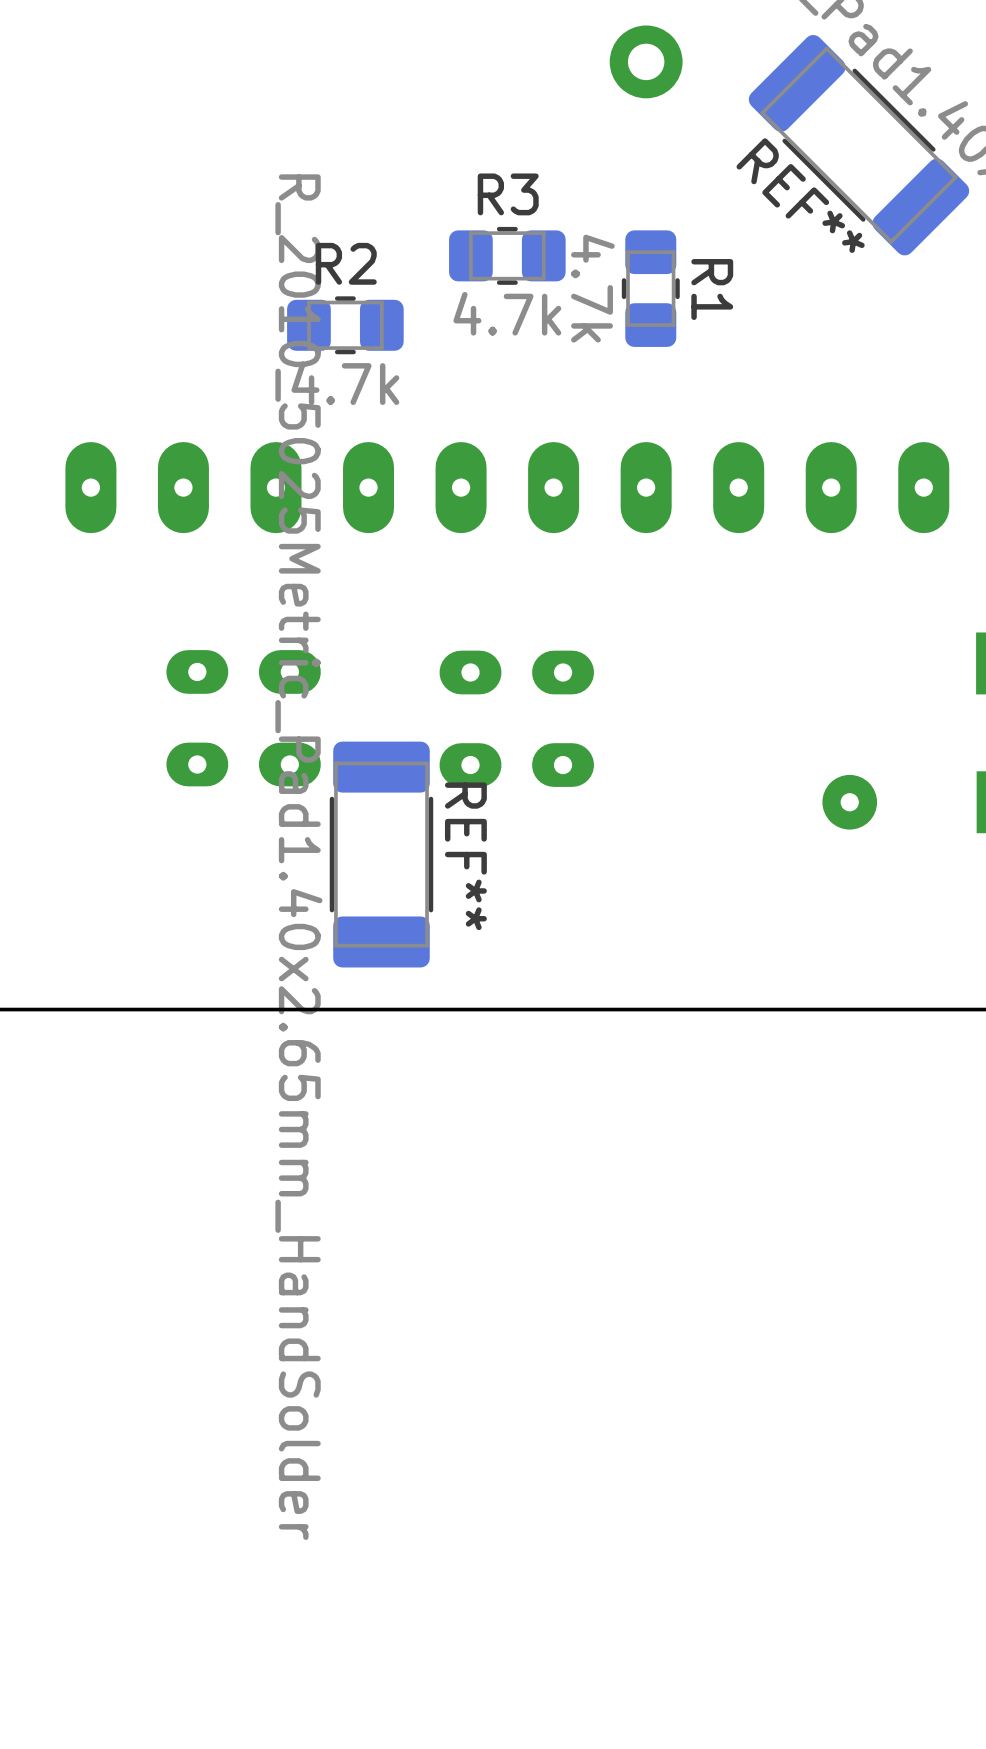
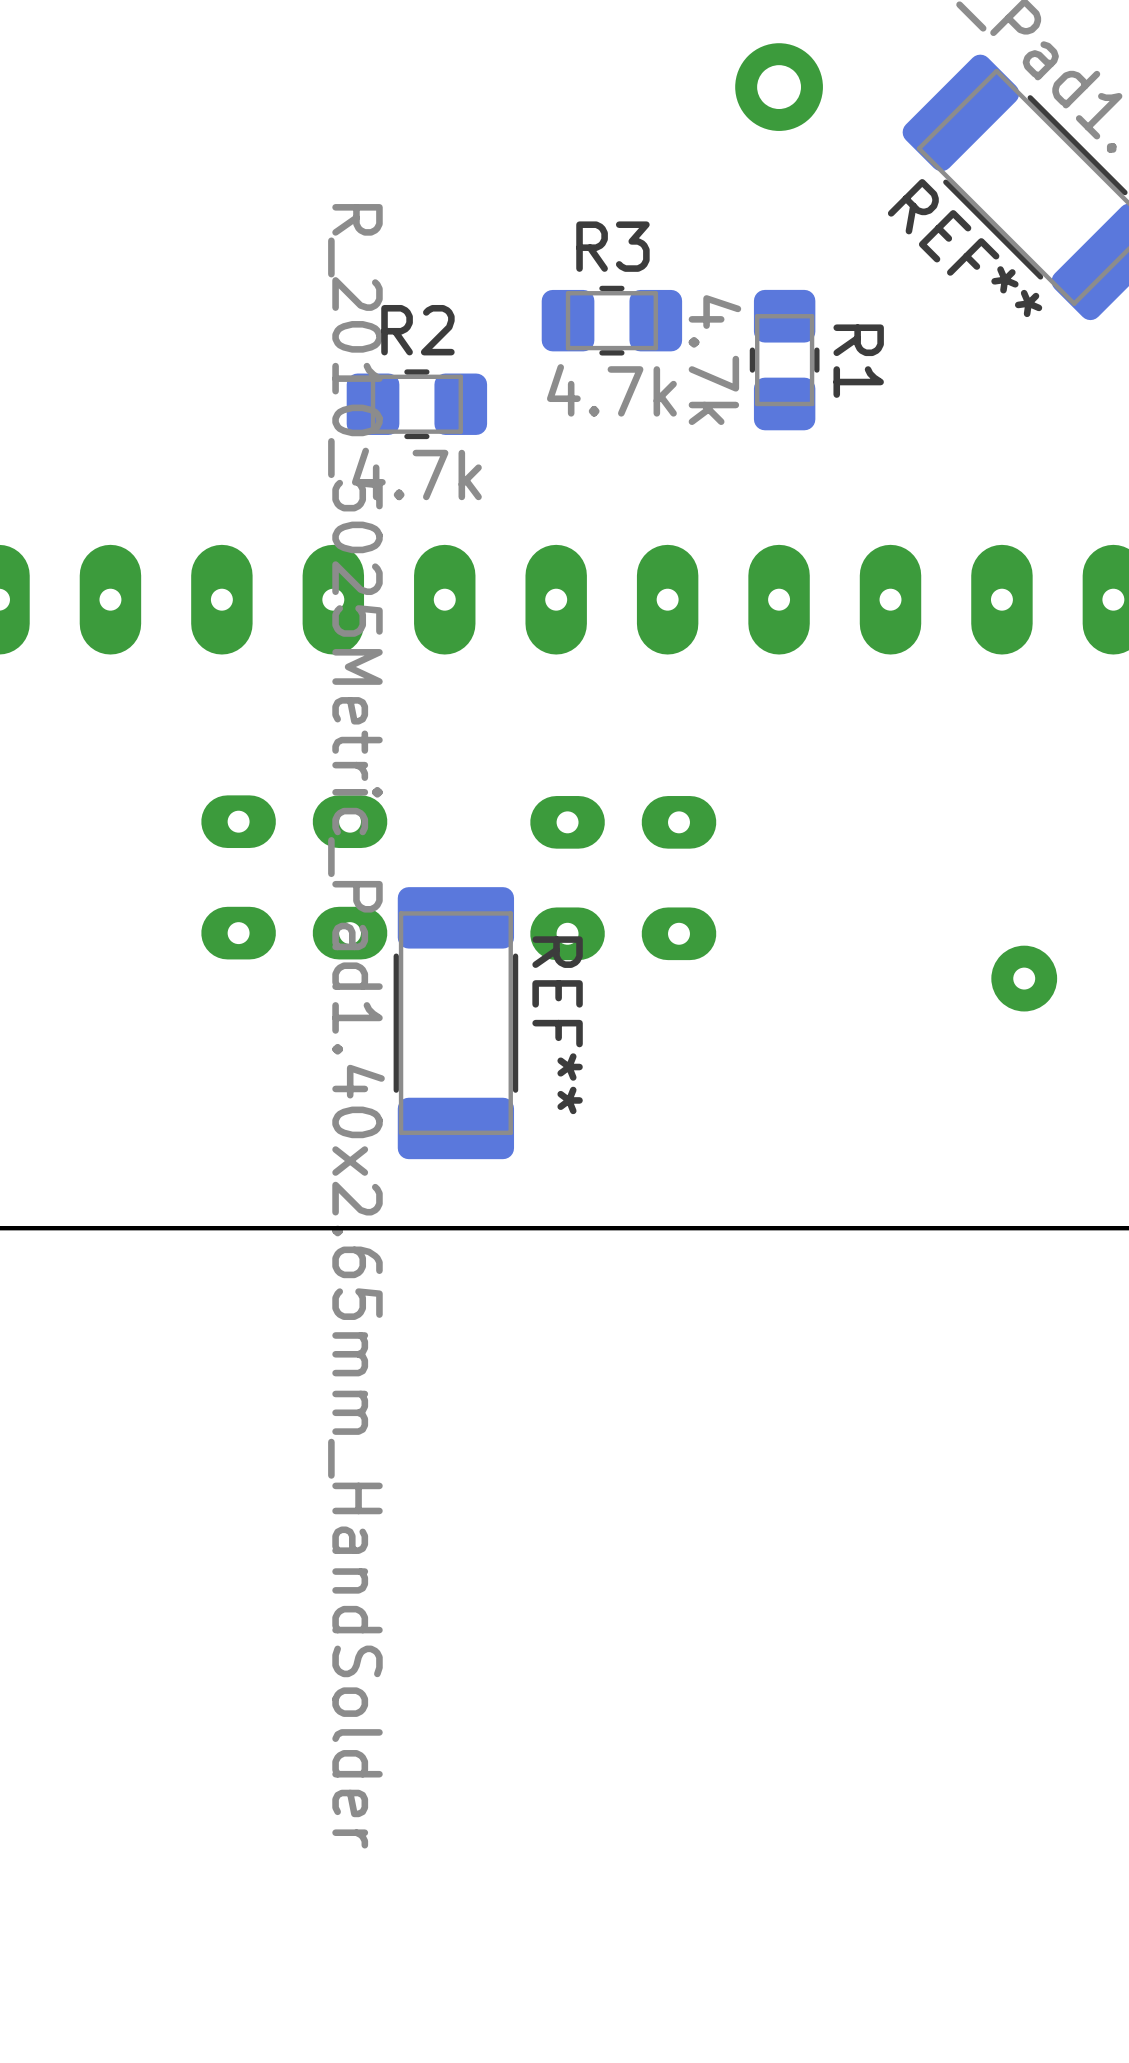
REF** position: (381, 854) -> (455, 1023)

